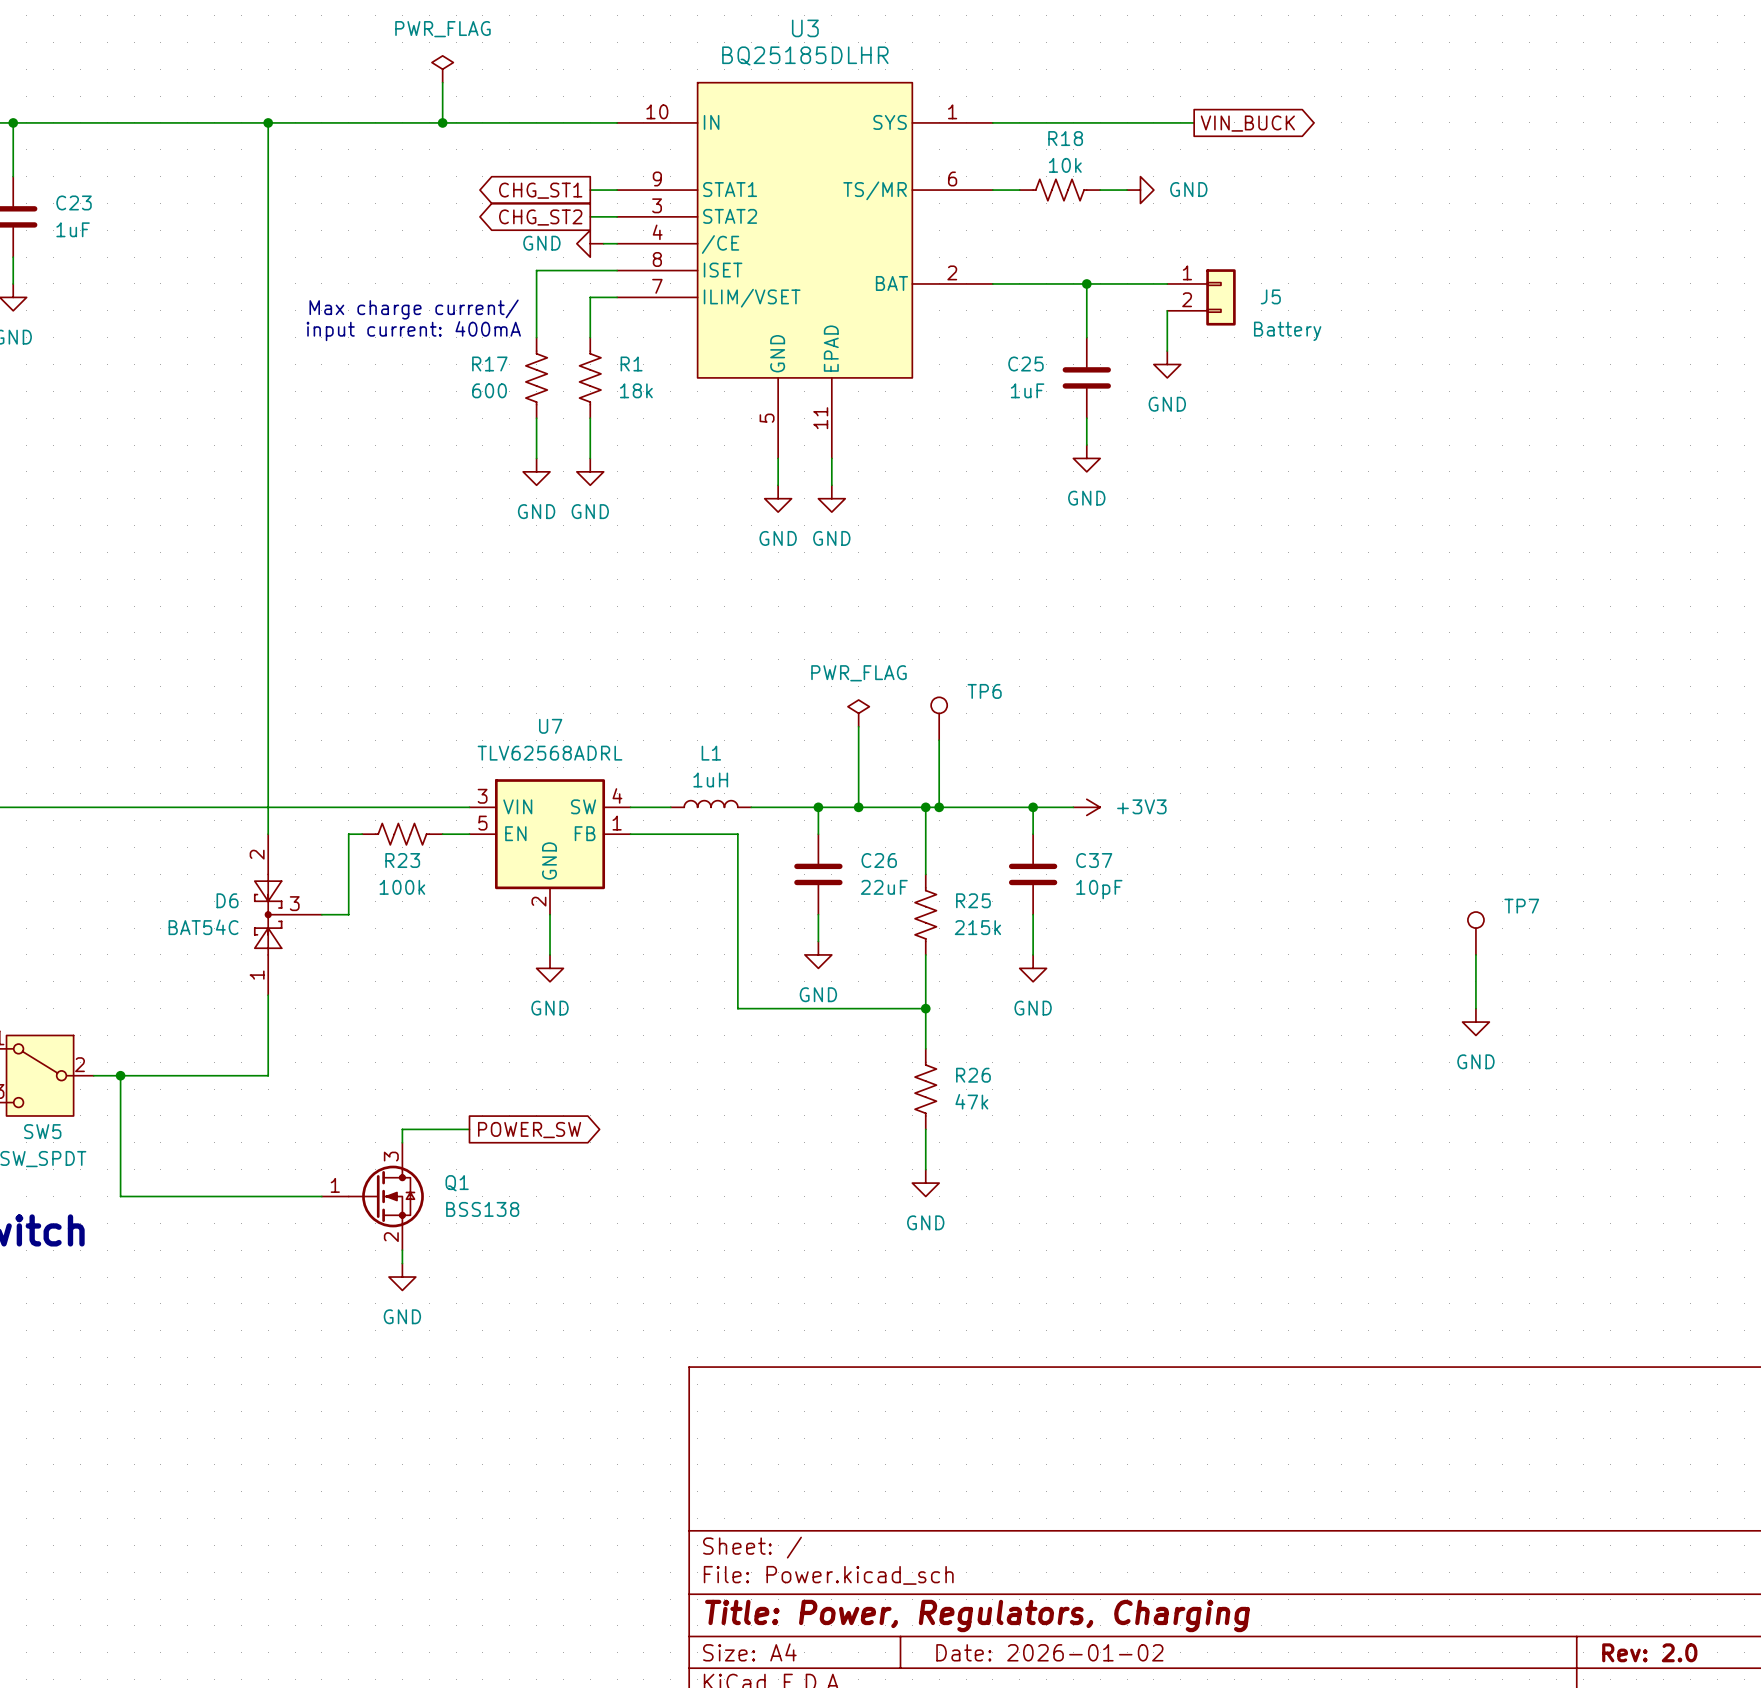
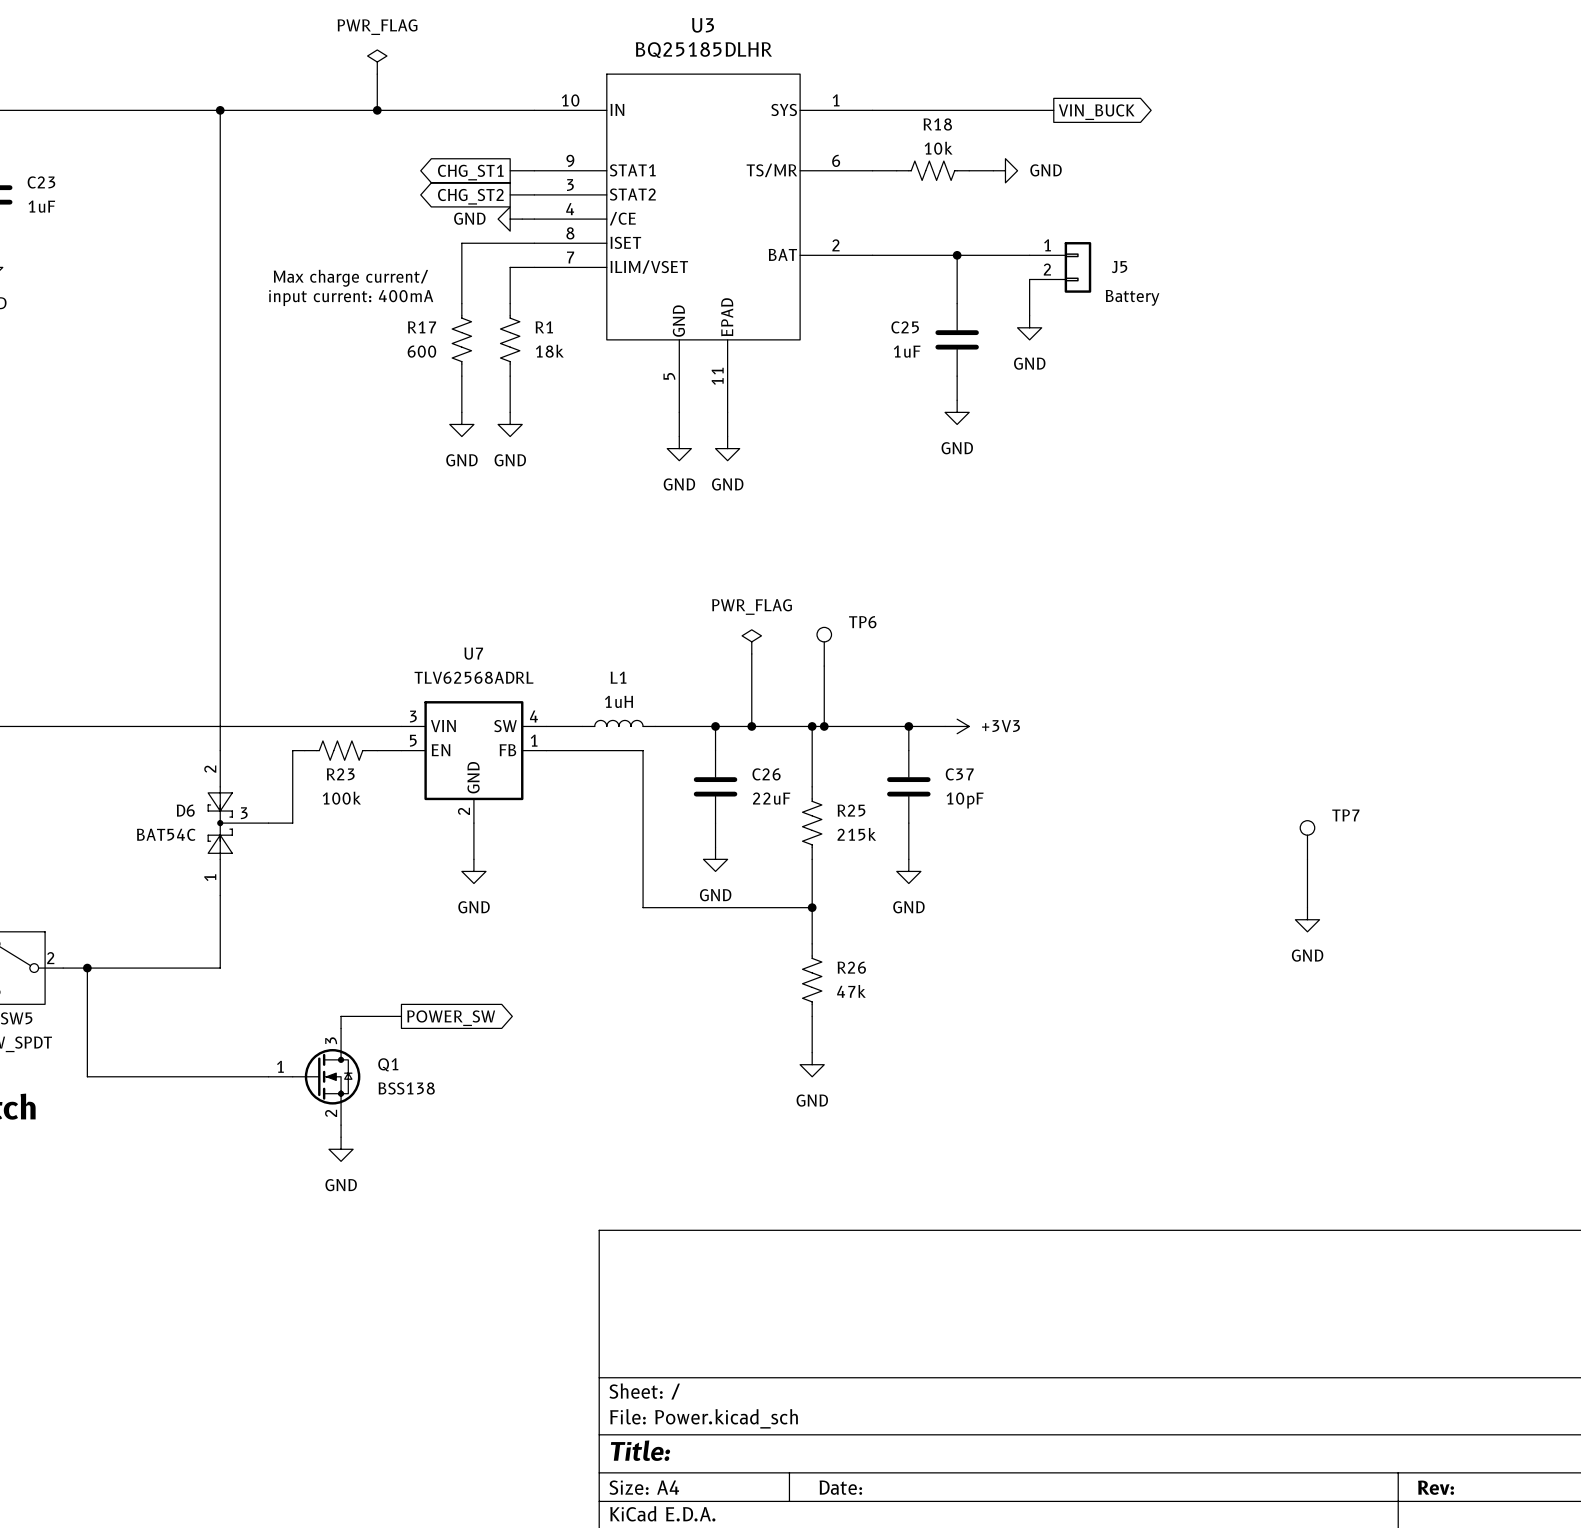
title block: Title: Power, Regulators, Charging (977, 1615) -> Title: (640, 1450)
title block: Date: 2026-01-02 (1049, 1652) -> Date: (840, 1487)
title block: Rev: 2.0 (1649, 1652) -> Rev: (1436, 1487)

